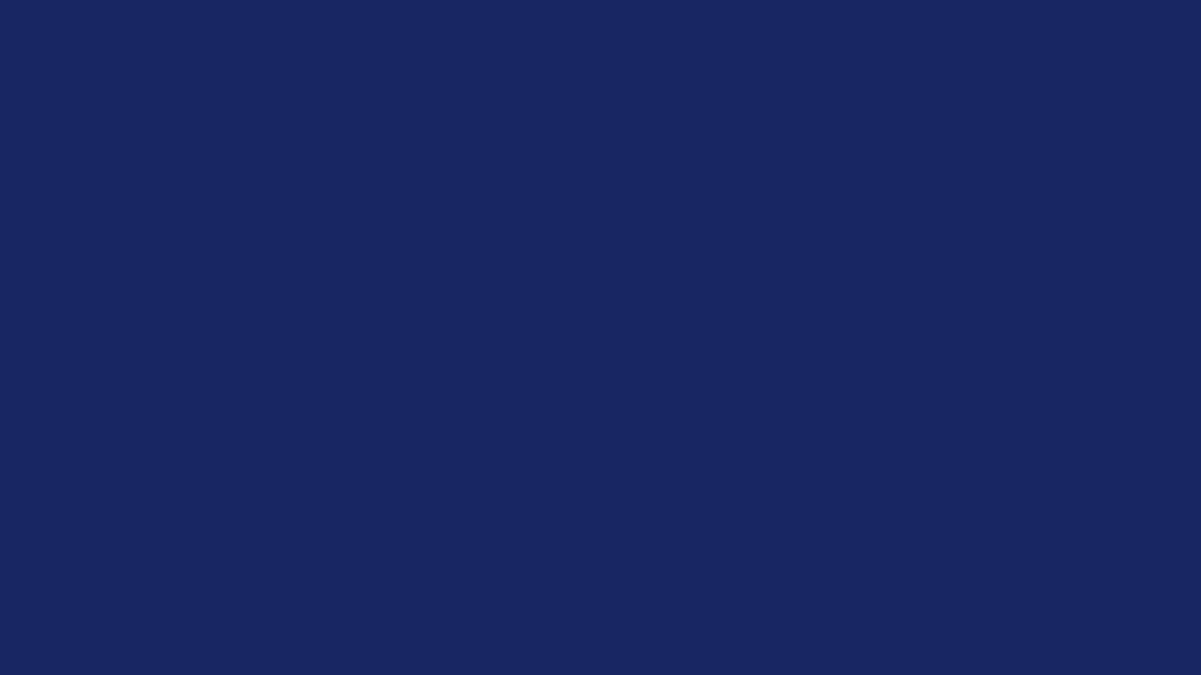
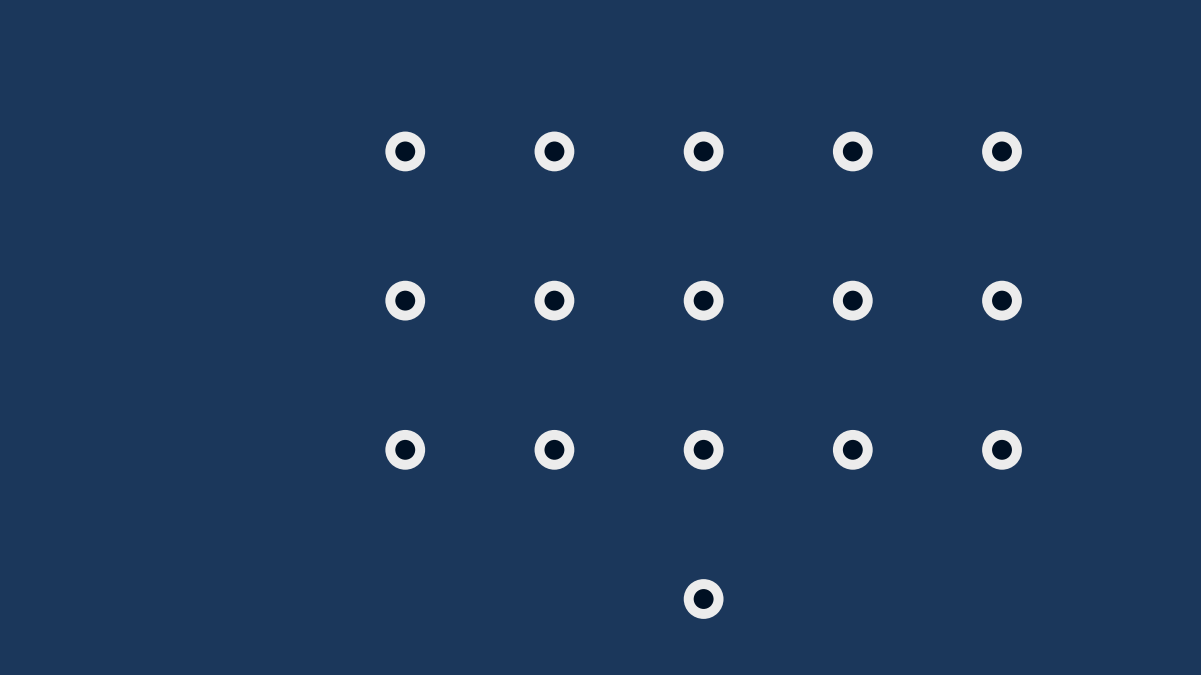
via: none -> (405, 151)
via: none -> (554, 151)
via: none -> (703, 151)
via: none -> (852, 151)
via: none -> (1002, 151)
via: none -> (405, 300)
via: none -> (554, 300)
via: none -> (703, 300)
via: none -> (852, 300)
via: none -> (1002, 300)
via: none -> (405, 449)
via: none -> (554, 449)
via: none -> (703, 449)
via: none -> (852, 449)
via: none -> (1002, 449)
via: none -> (703, 599)

